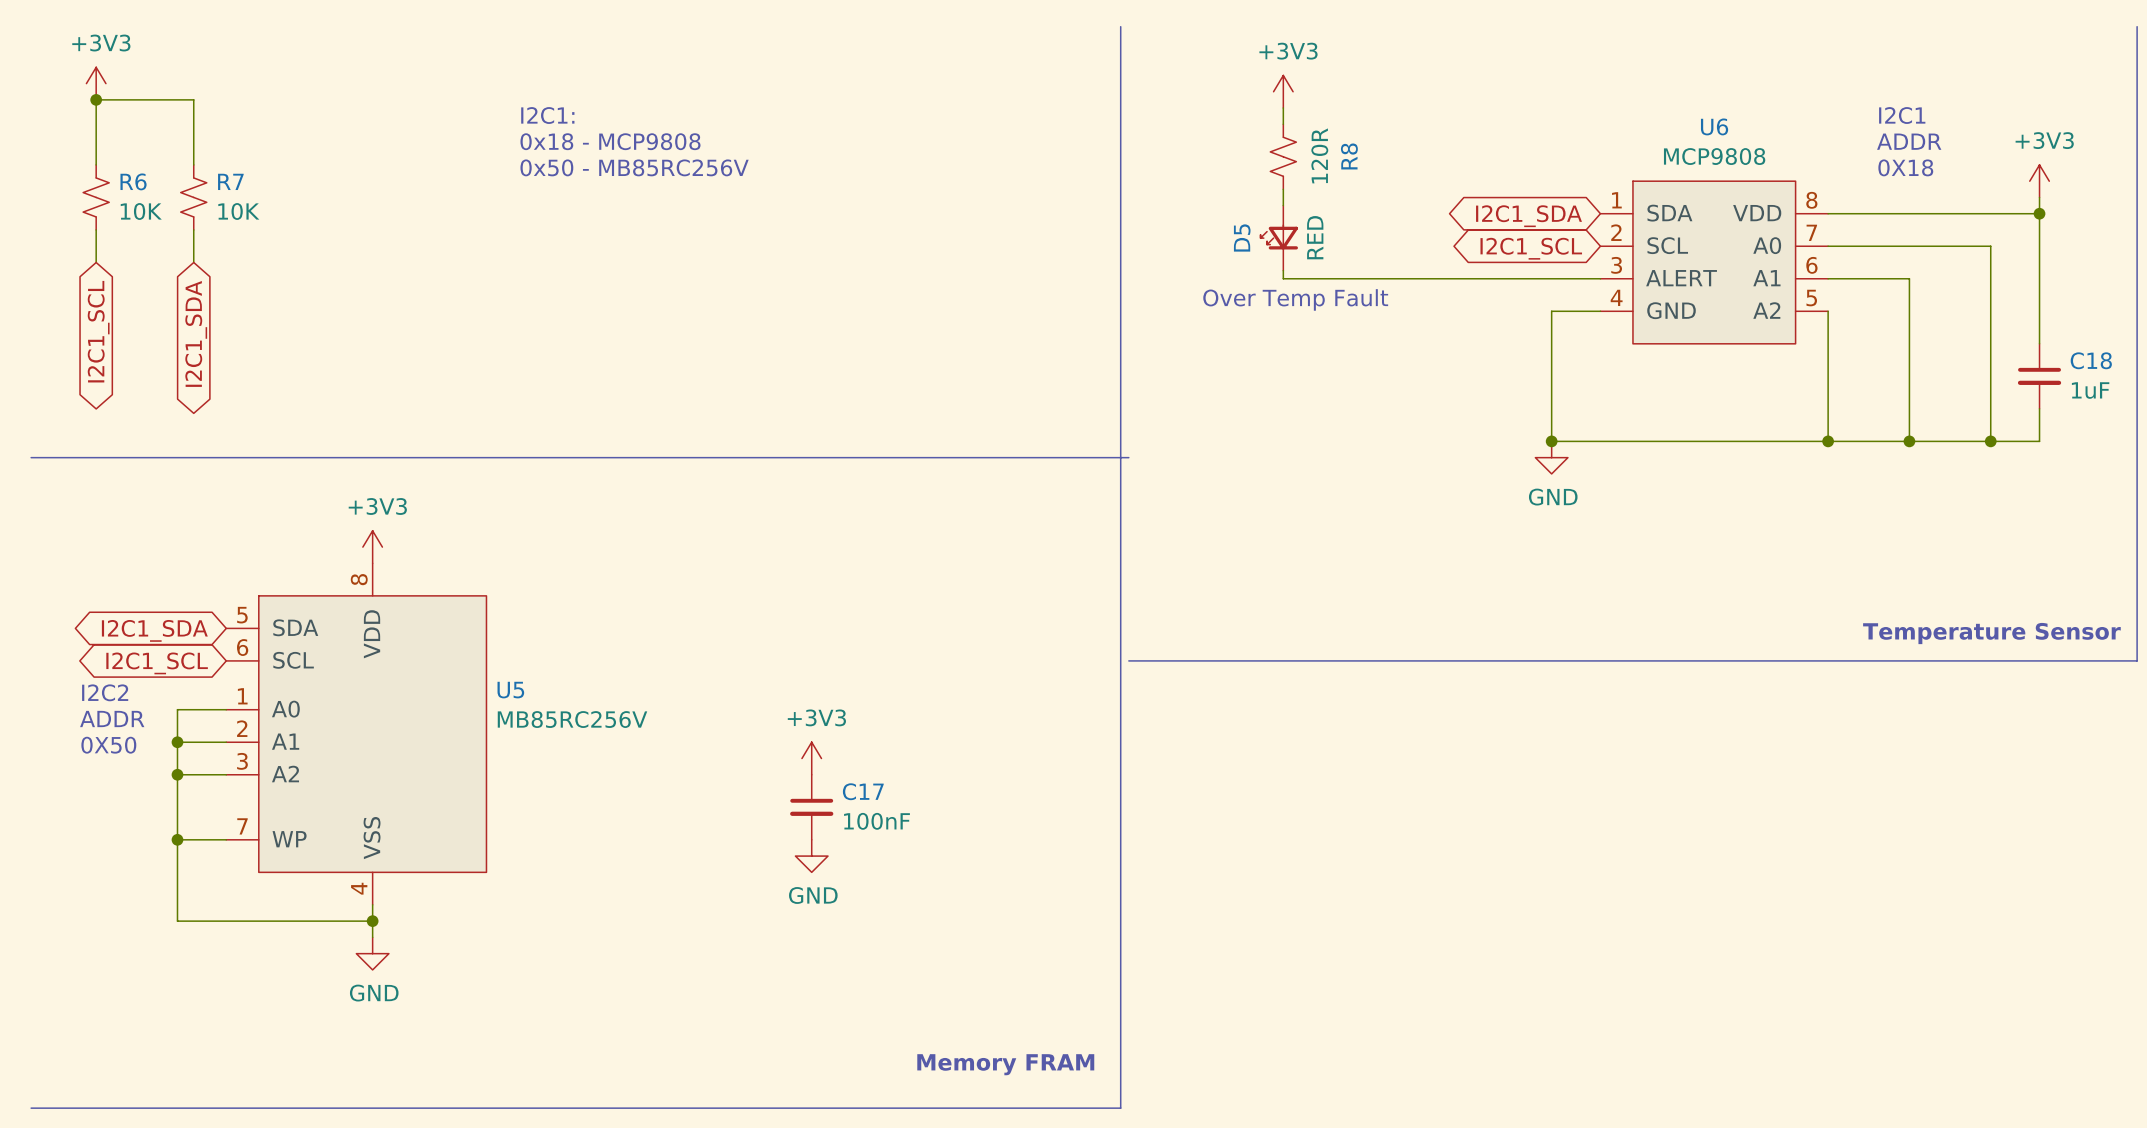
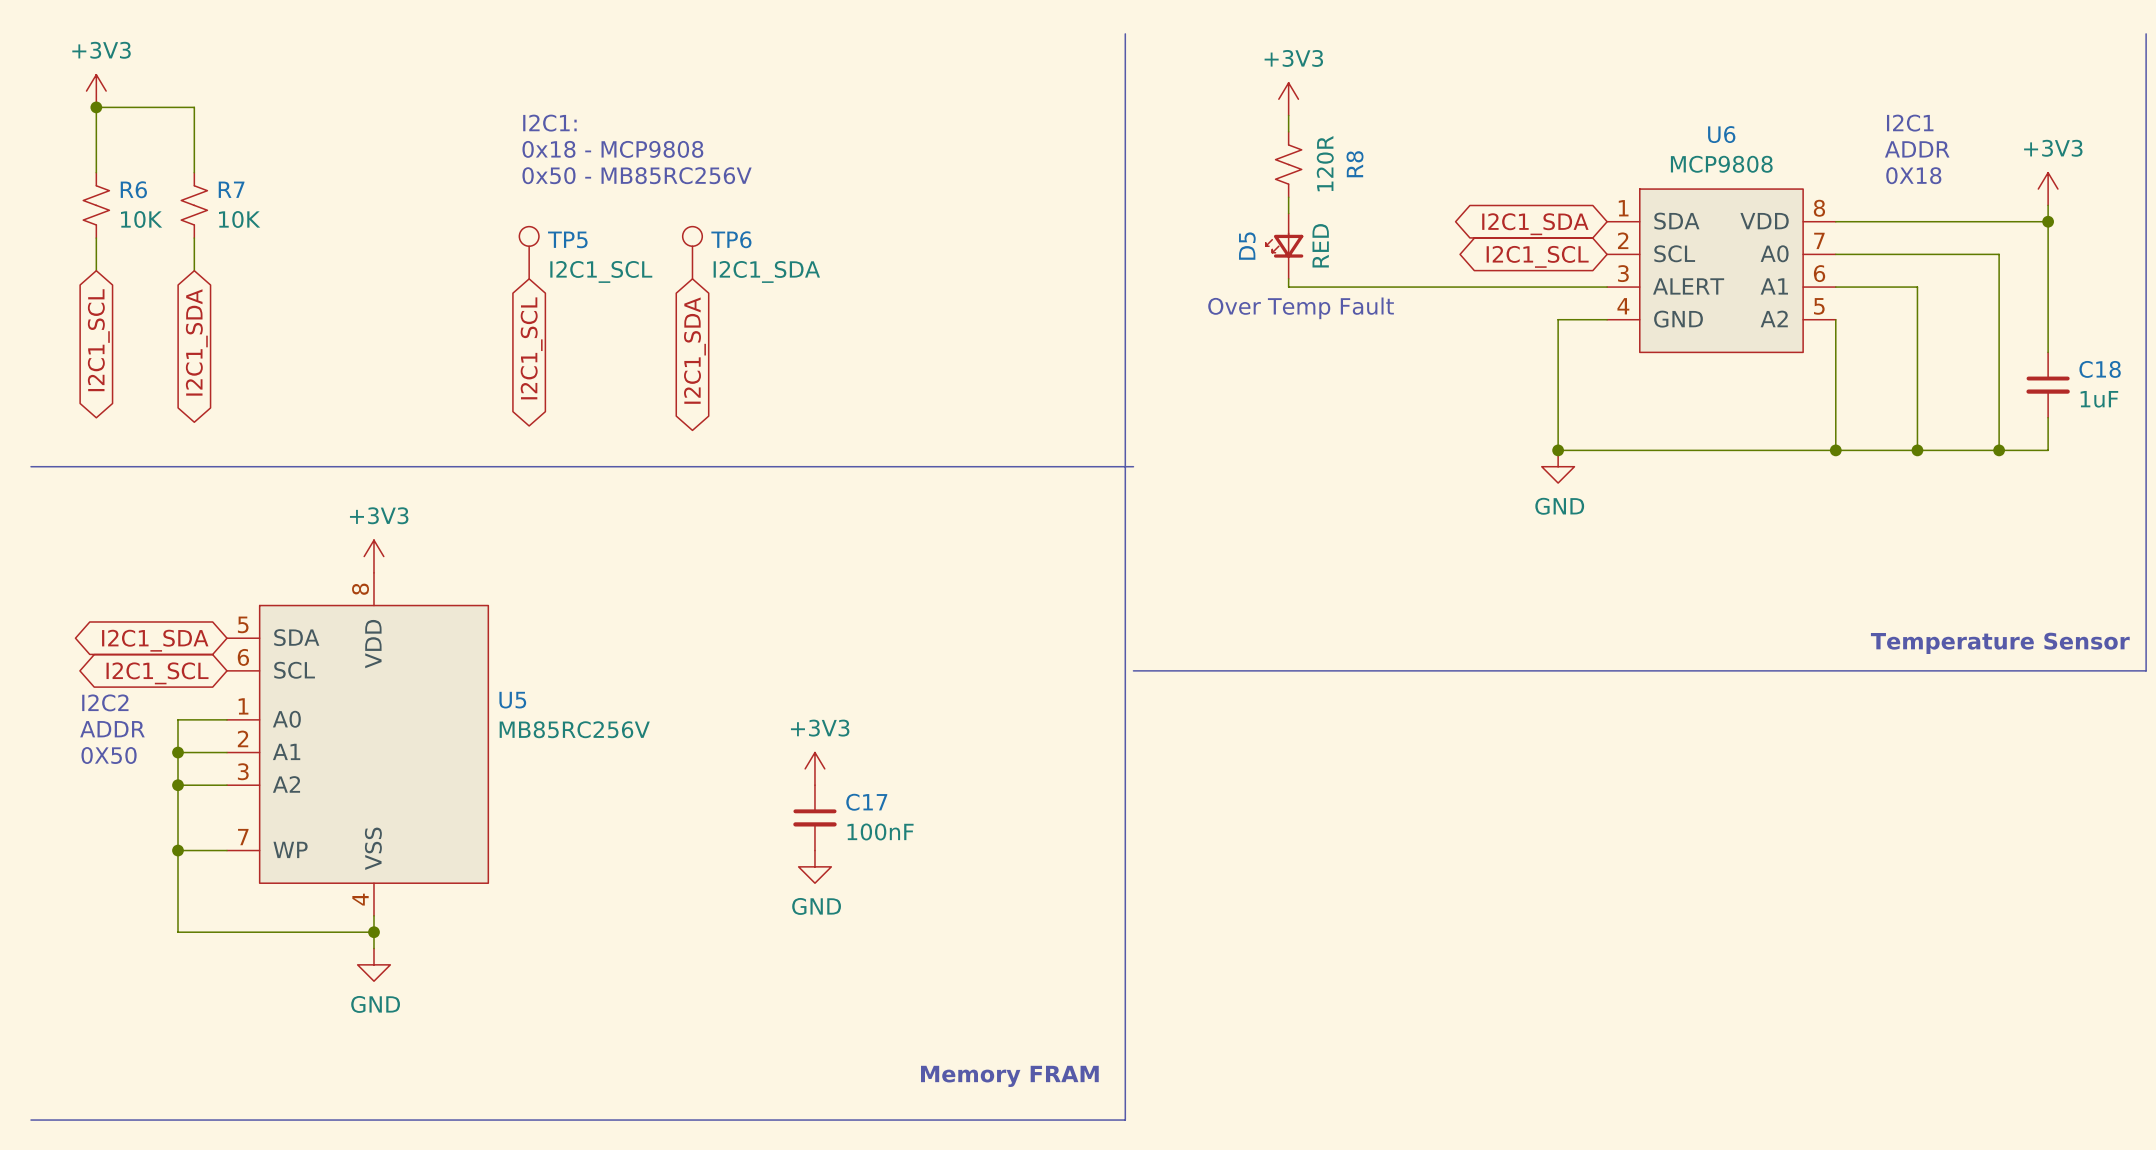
TP5: none -> I2C1_SCL (529, 252)
TP6: none -> I2C1_SDA (692, 252)
global label: none -> I2C1_SCL (531, 348)
global label: none -> I2C1_SDA (694, 350)

